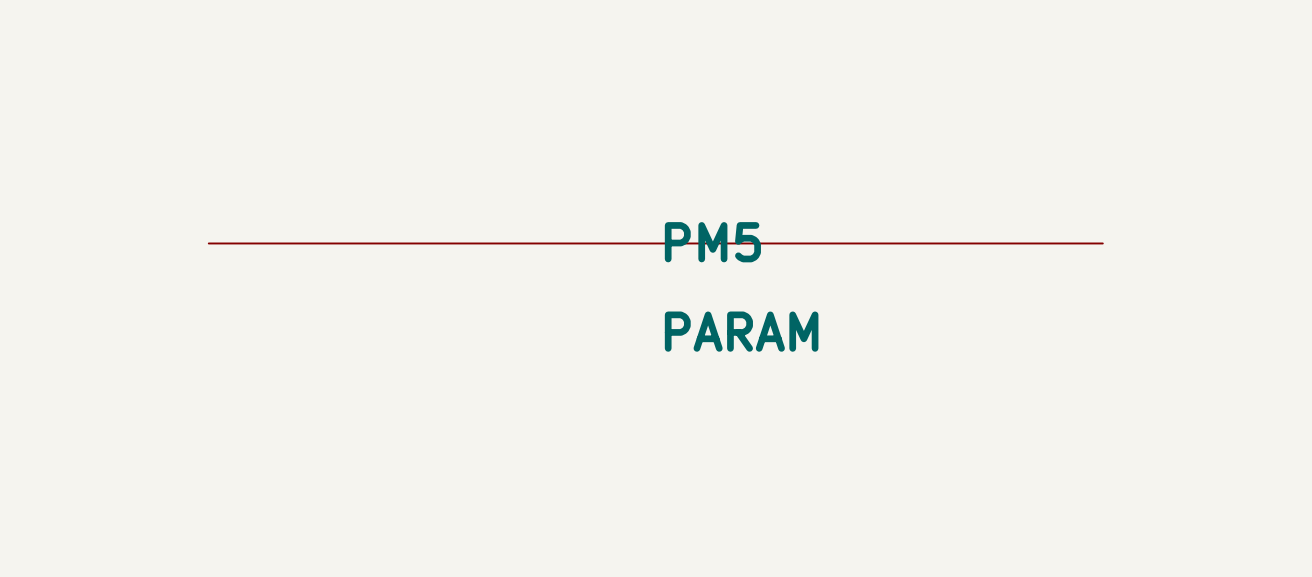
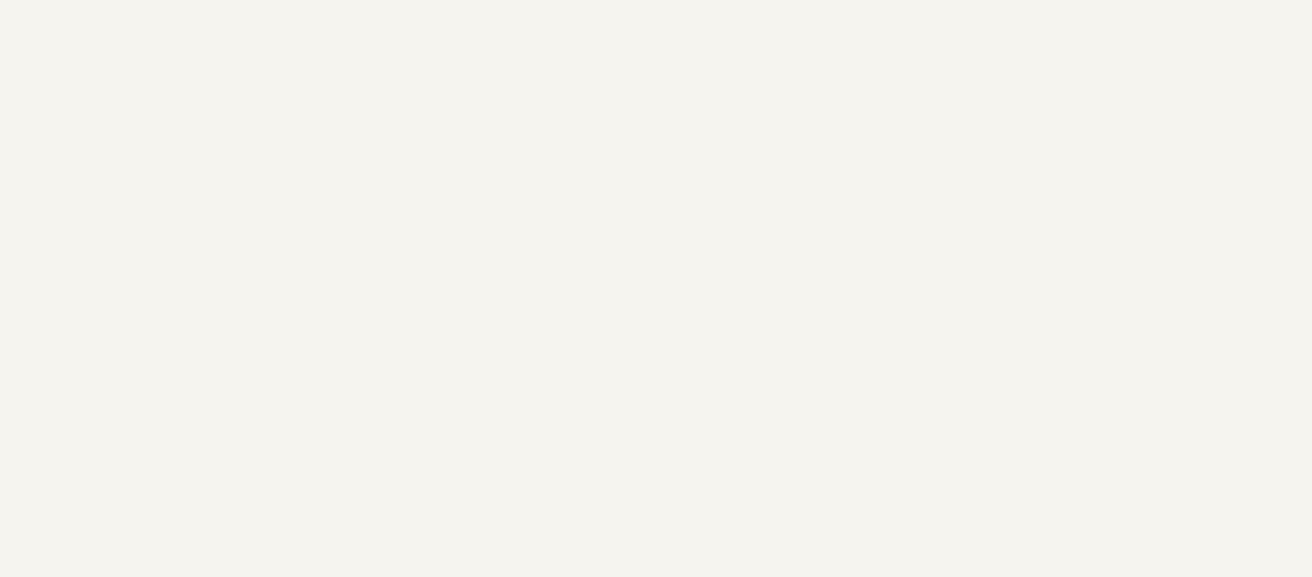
PM5: PARAM (655, 243) -> none

